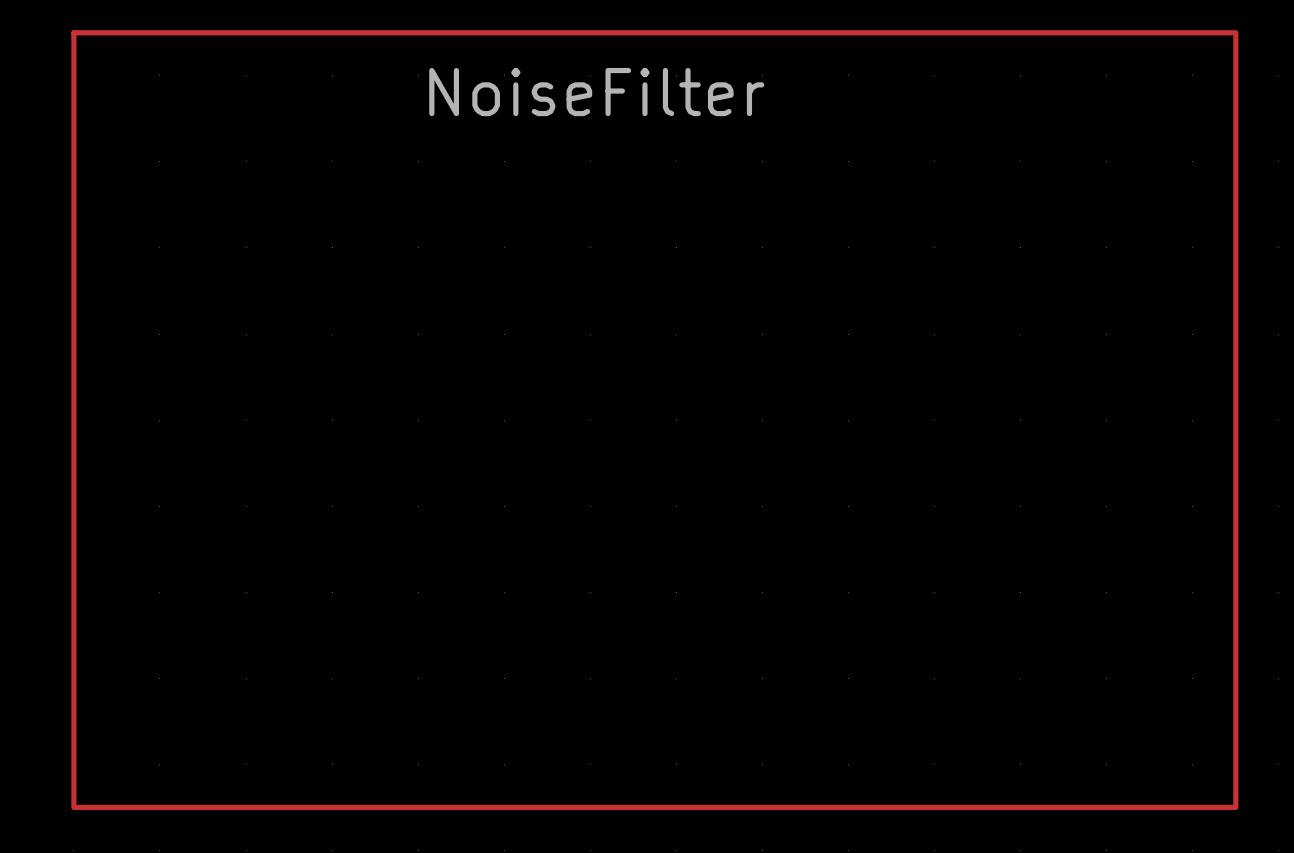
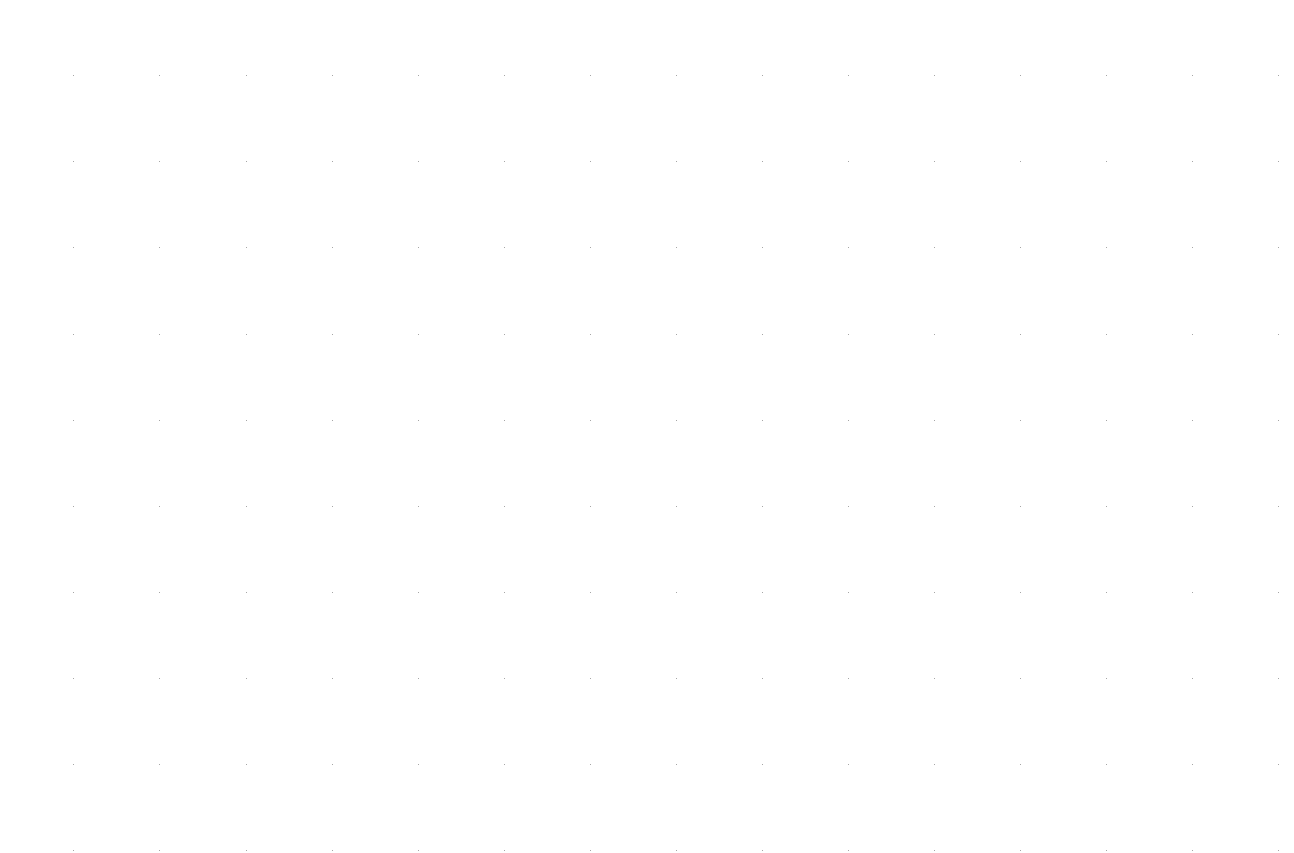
sheet NoiseFilter: (654, 420) -> none

